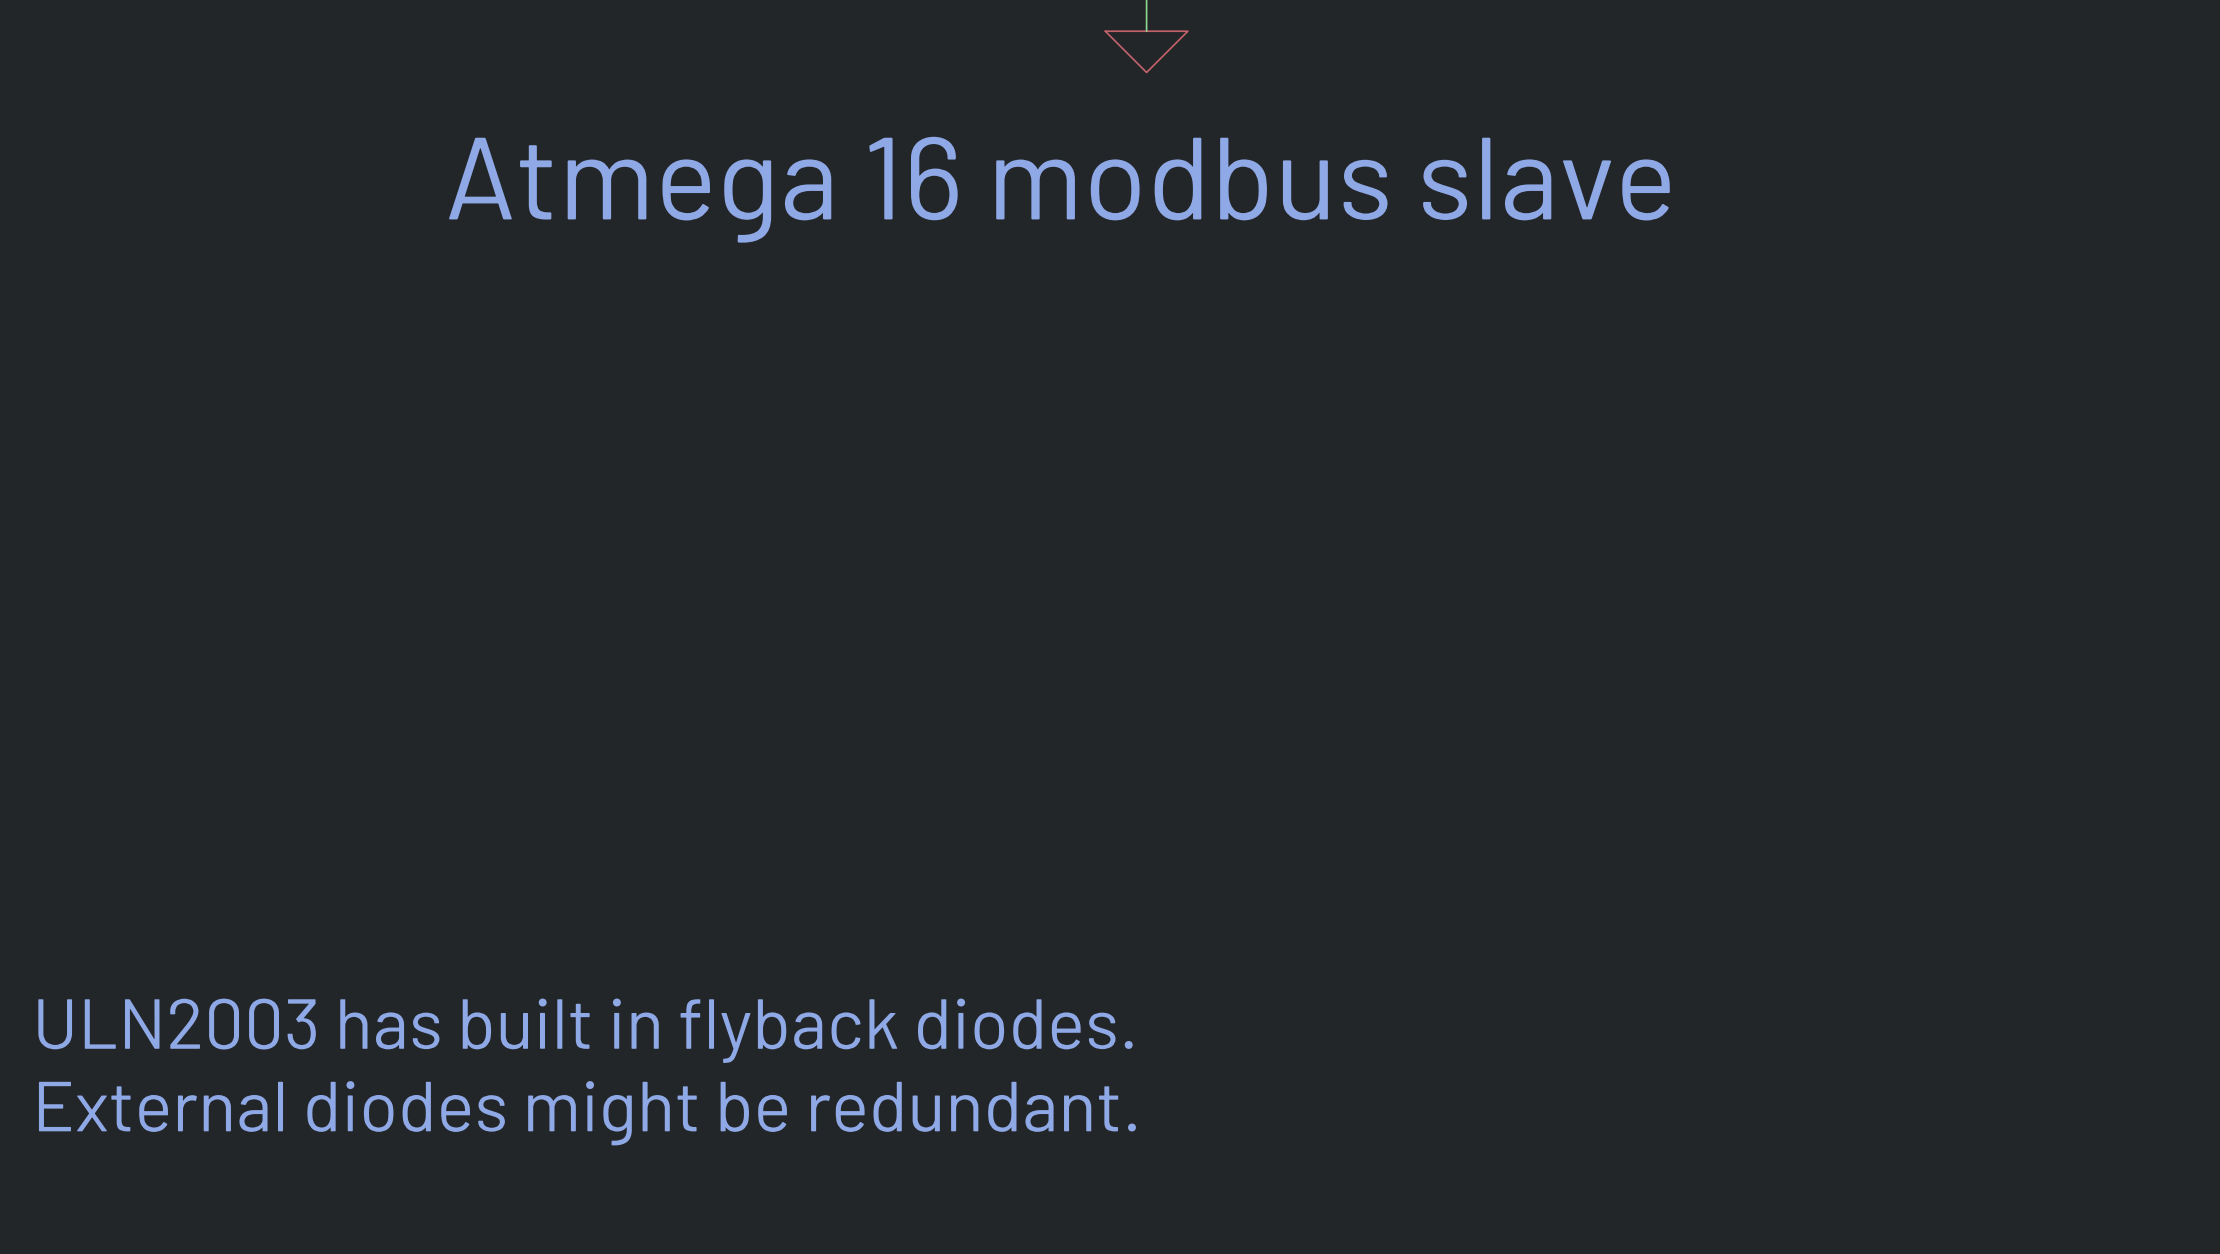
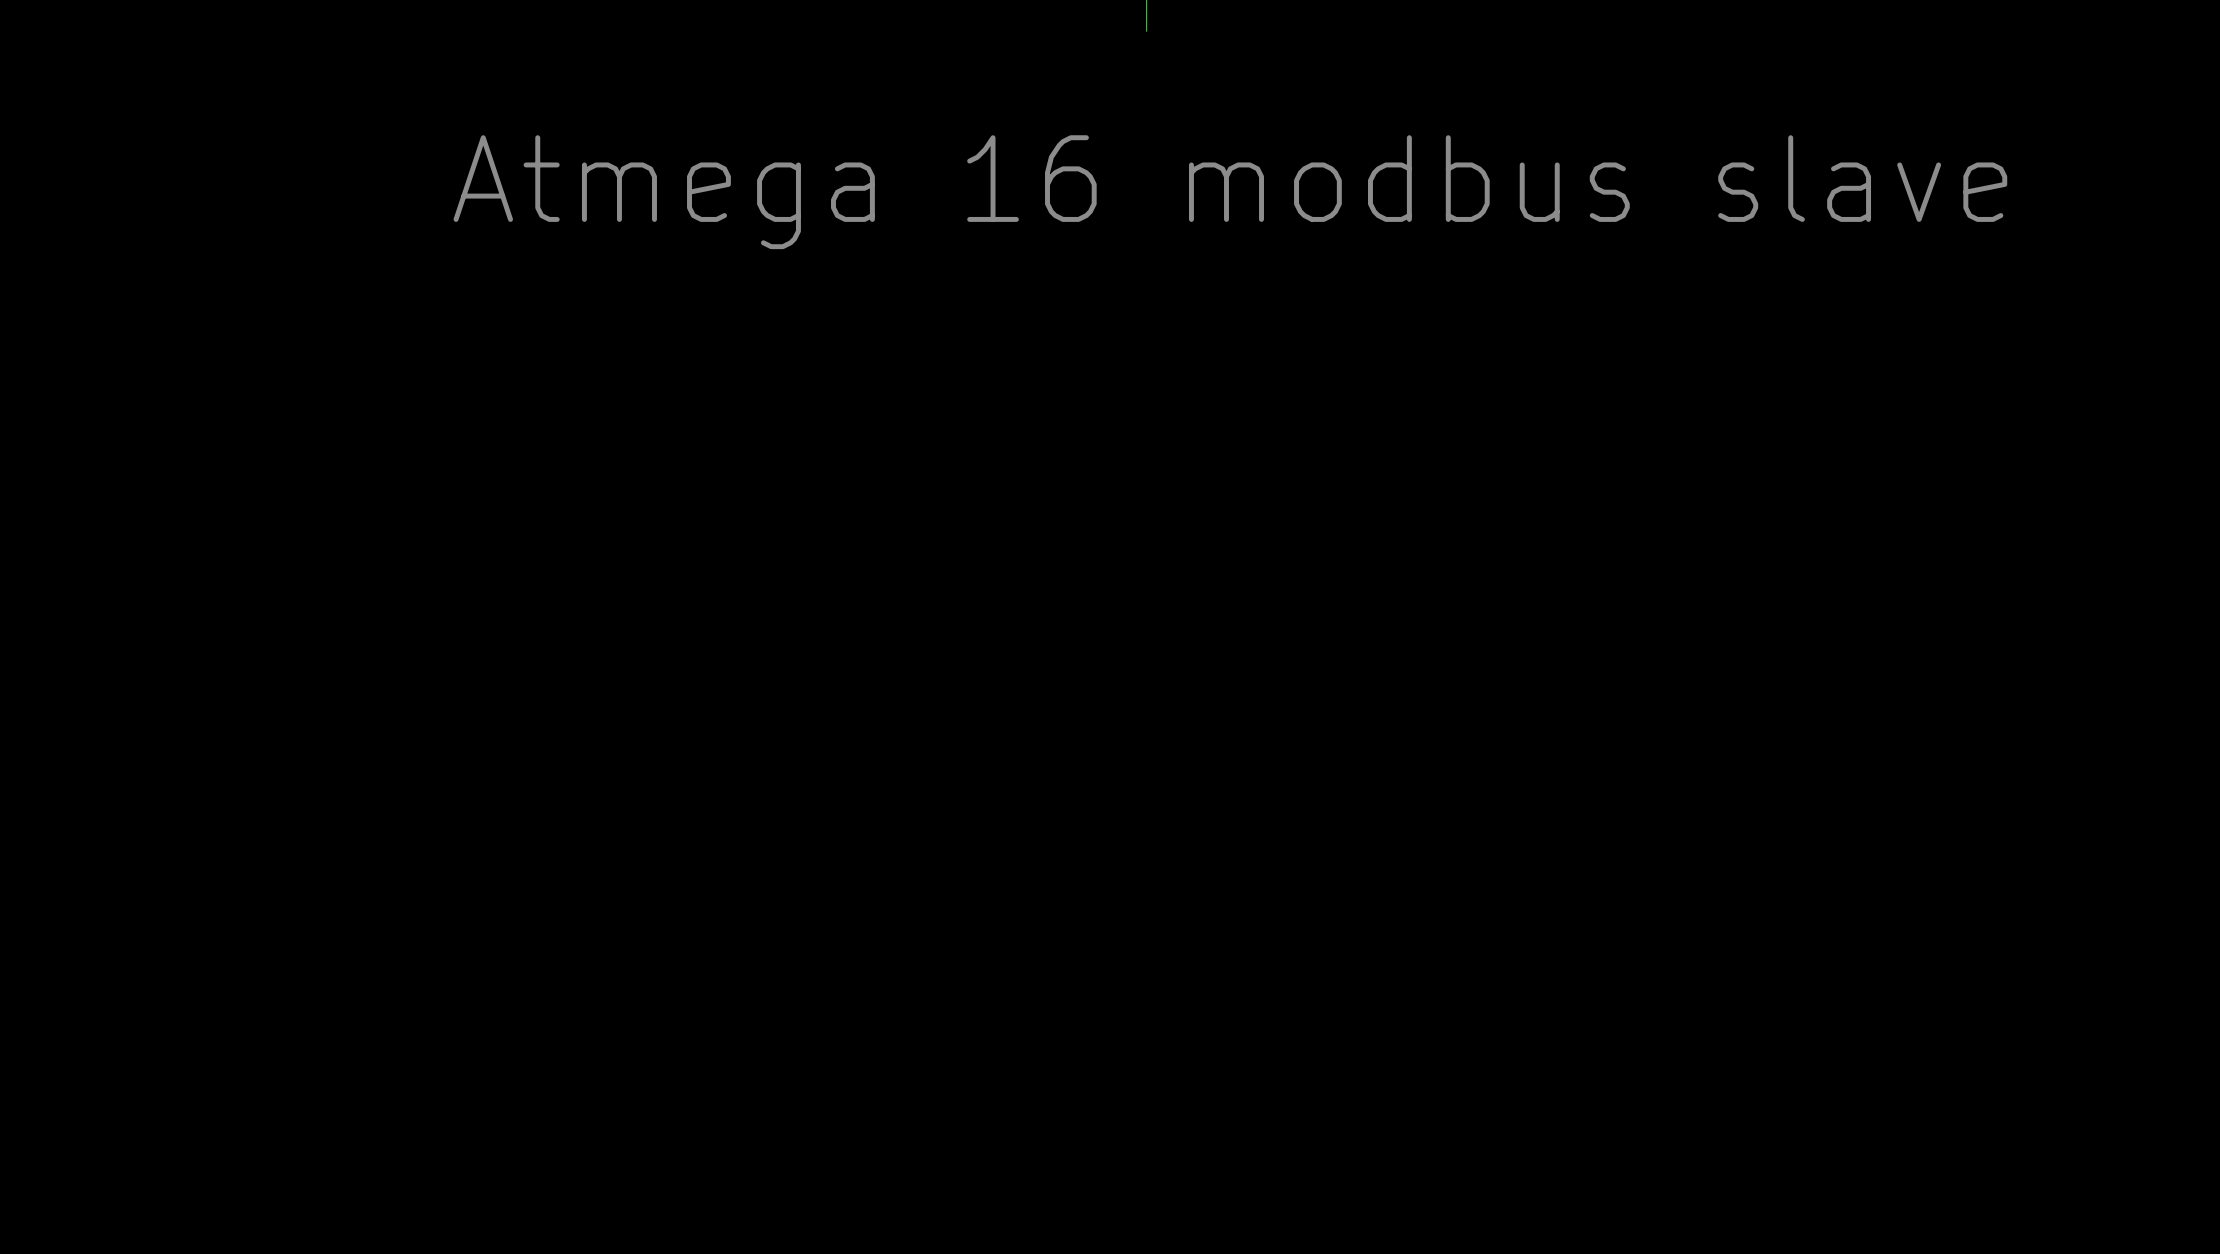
power symbol: (1146, 51) -> none
text: ULN2003 has built in flyback diodes. (585, 1030) -> none
text: External diodes might be redundant. (587, 1113) -> none

